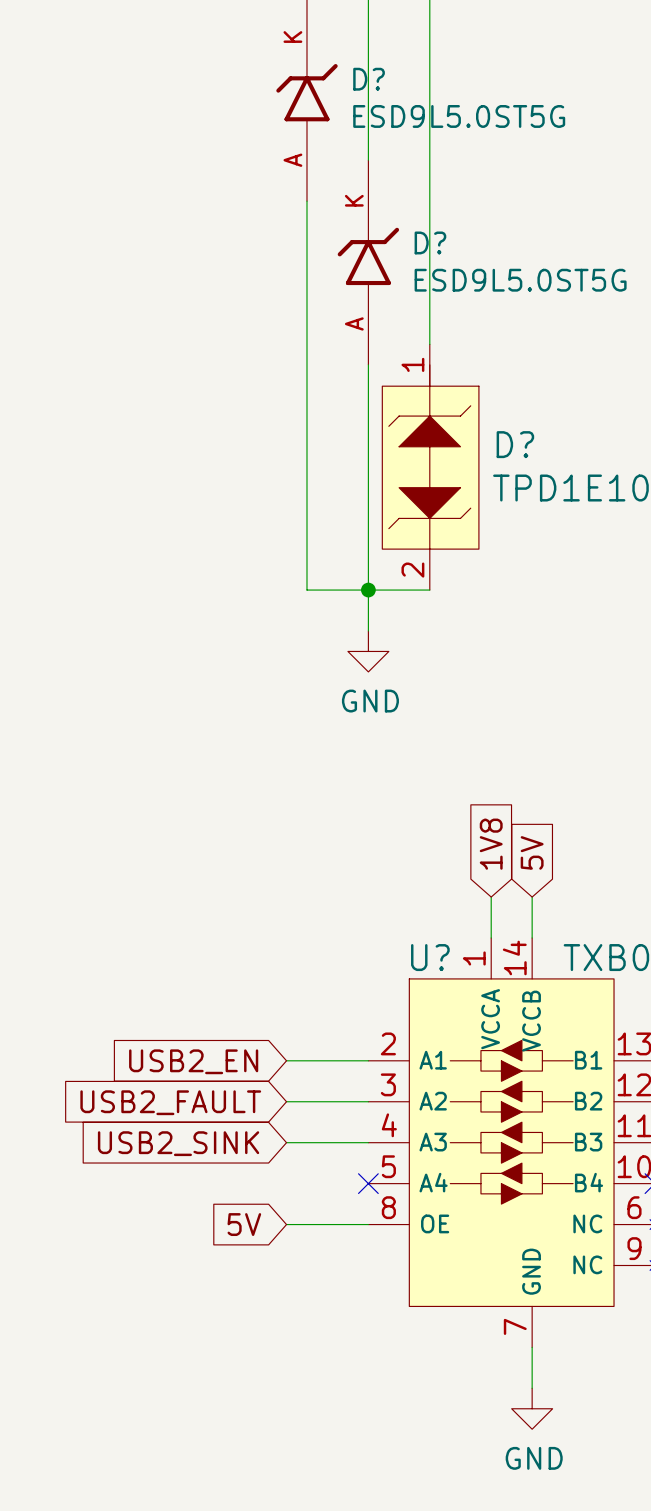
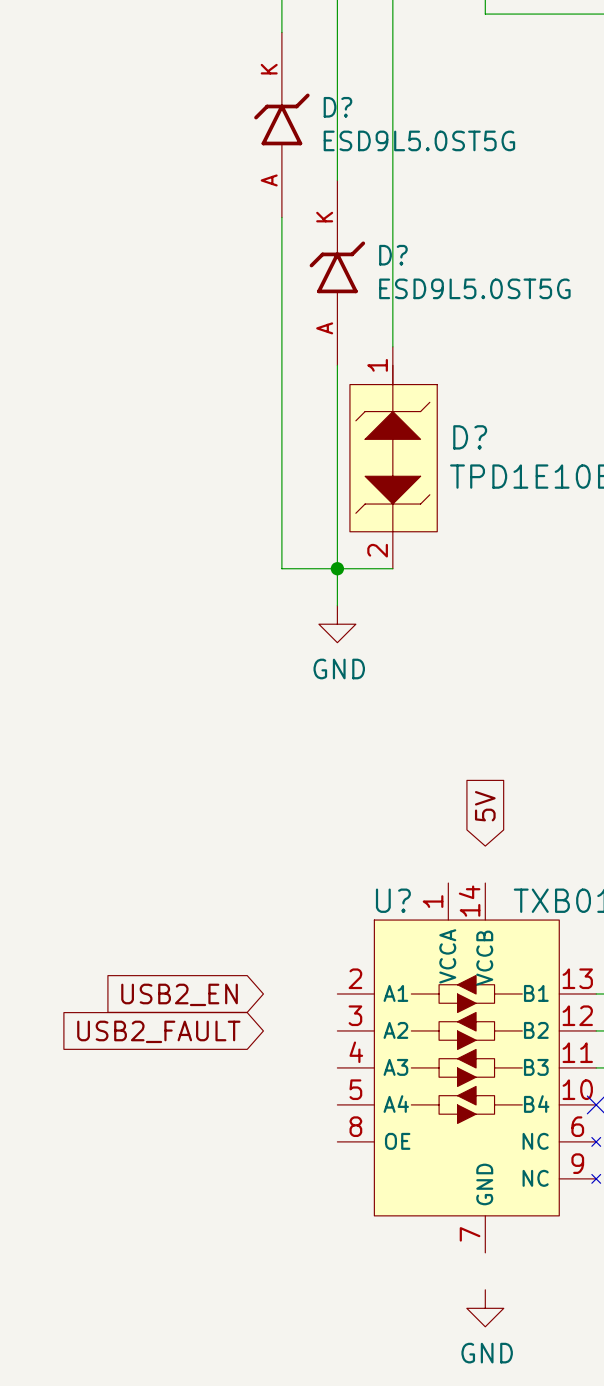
global label: 1V8 (491, 844) -> none
wire: (491, 897) (491, 938) -> none
wire: (532, 897) (532, 938) -> none
wire: (286, 1060) (368, 1060) -> none
wire: (286, 1101) (368, 1101) -> none
wire: (286, 1142) (368, 1142) -> none
global label: USB2_SINK (178, 1143) -> none
no-connect mark: (368, 1183) -> none
global label: 5V (244, 1224) -> none
wire: (286, 1224) (368, 1224) -> none
wire: (532, 1347) (532, 1388) -> none

